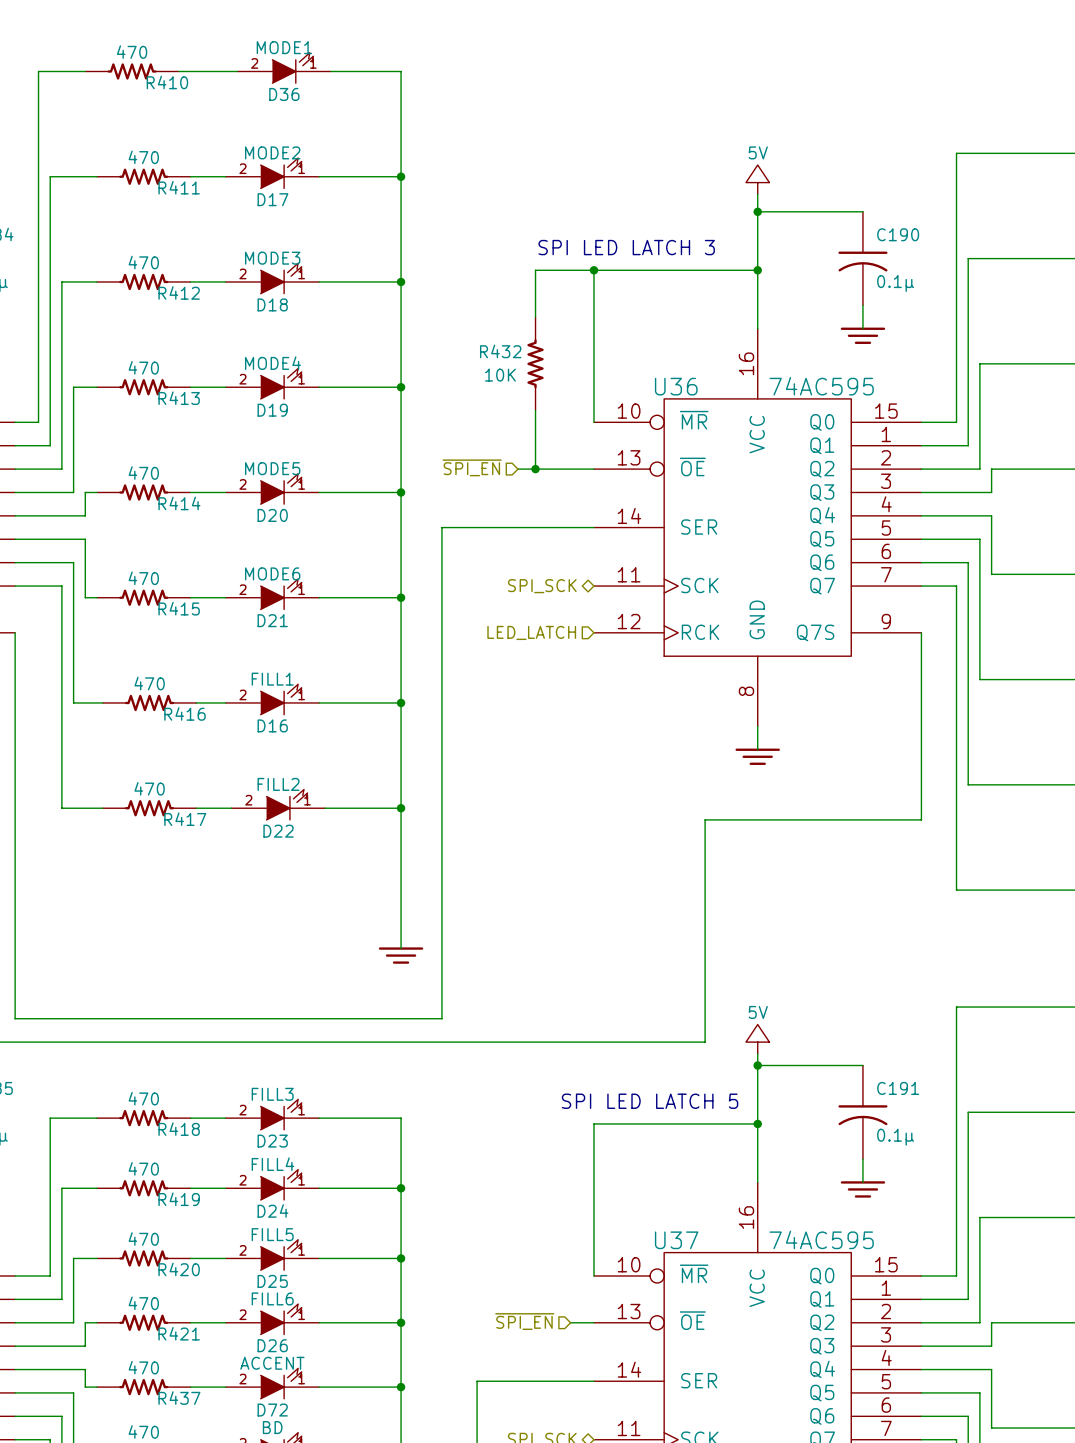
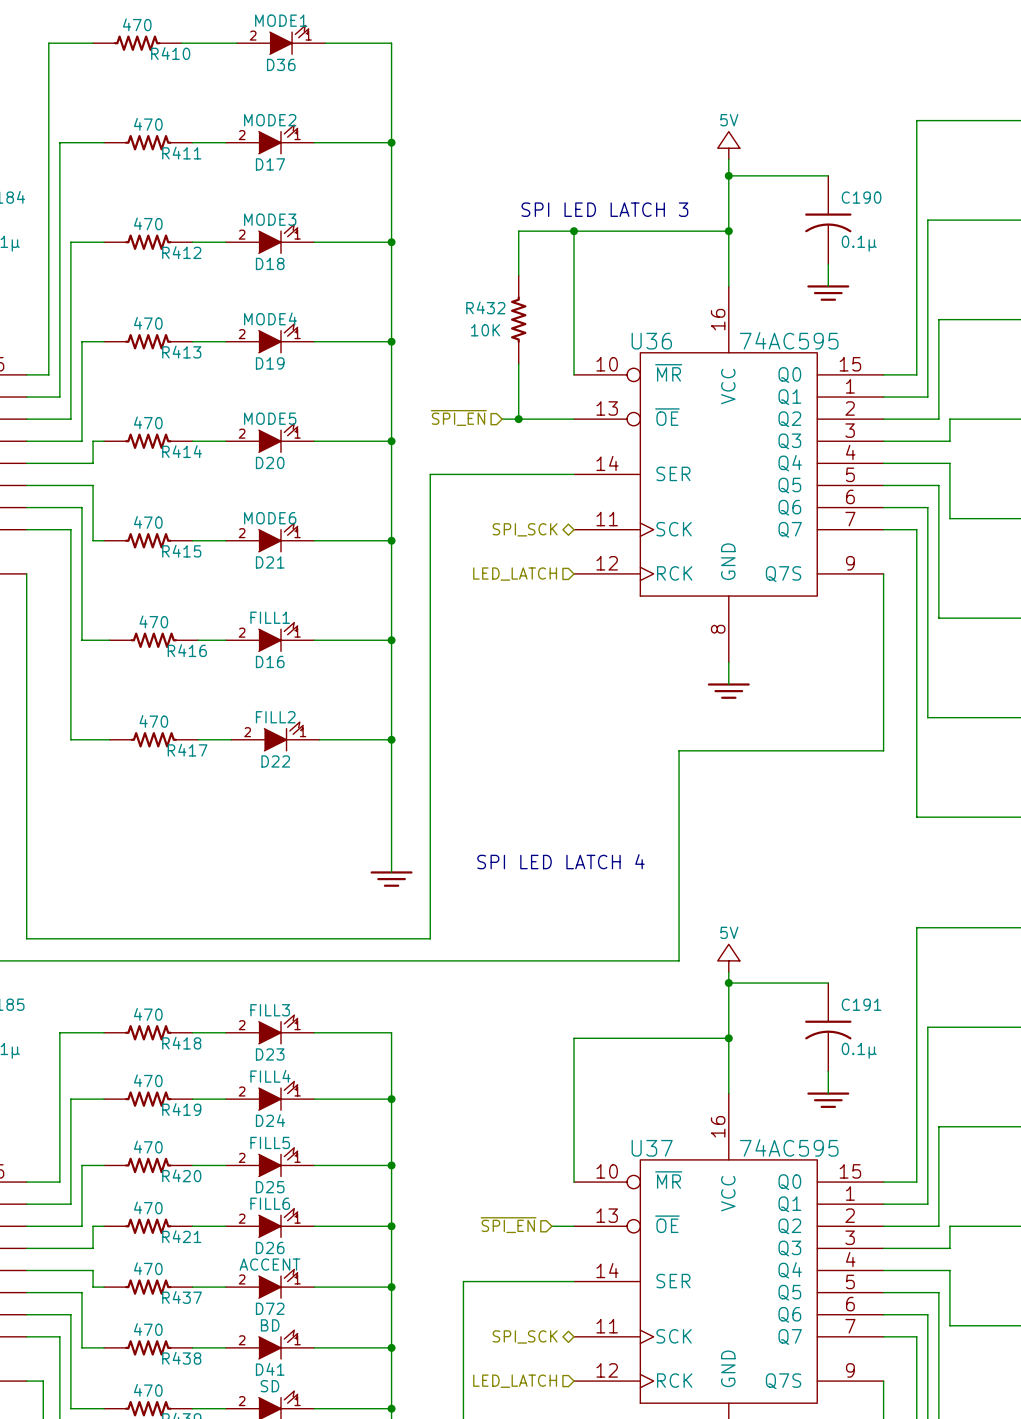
text: none -> SPI LED LATCH 4 (560, 861)
text: SPI LED LATCH 5 (650, 1101) -> none

